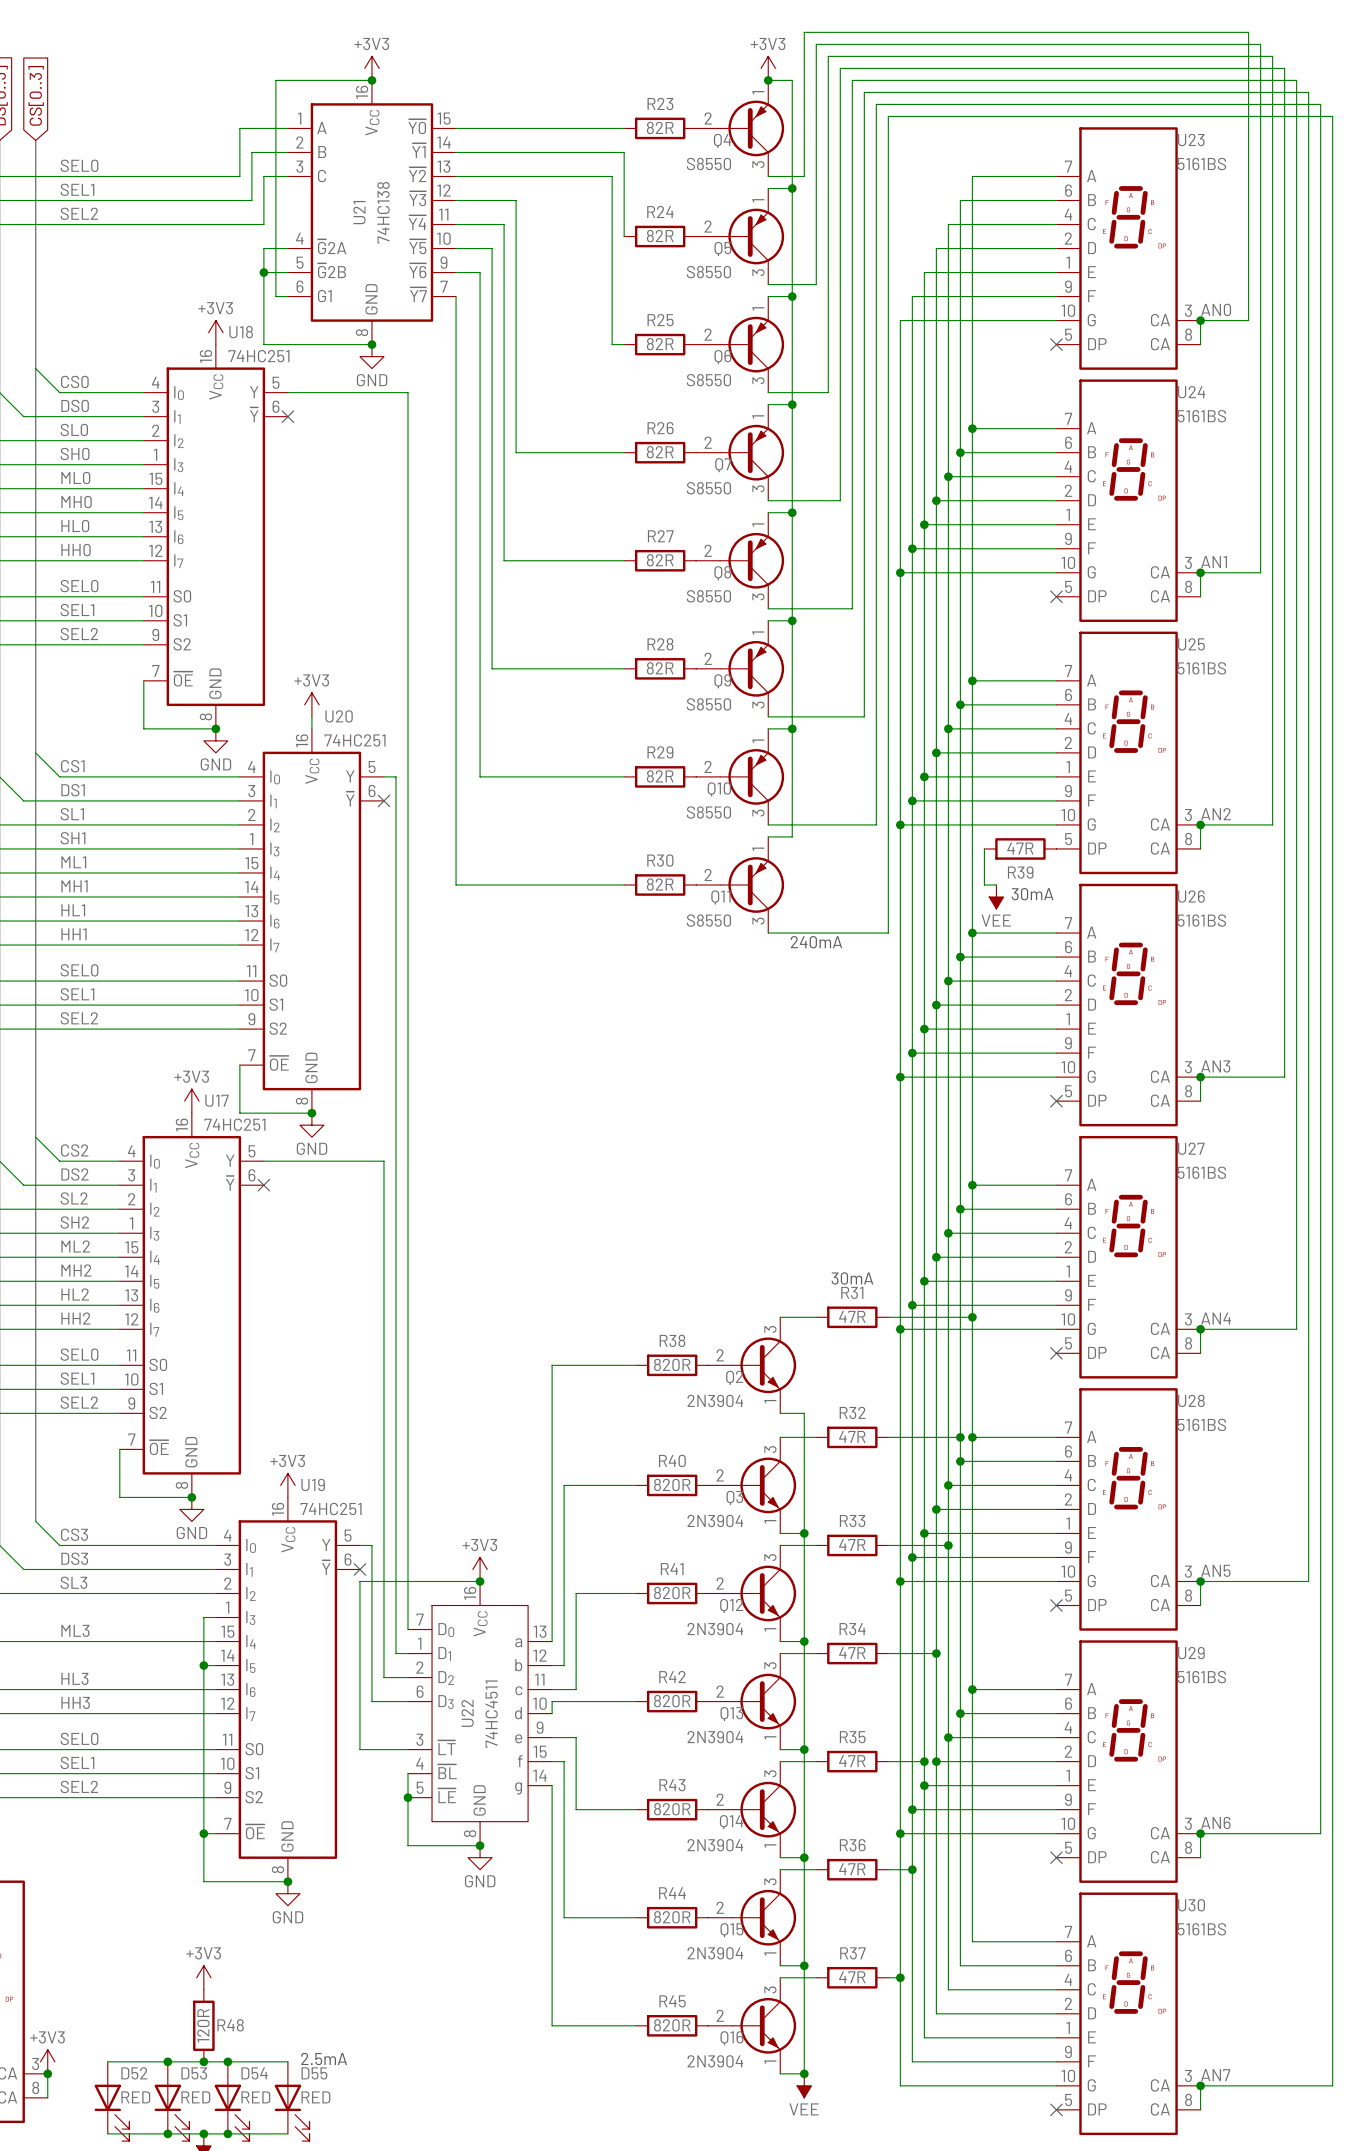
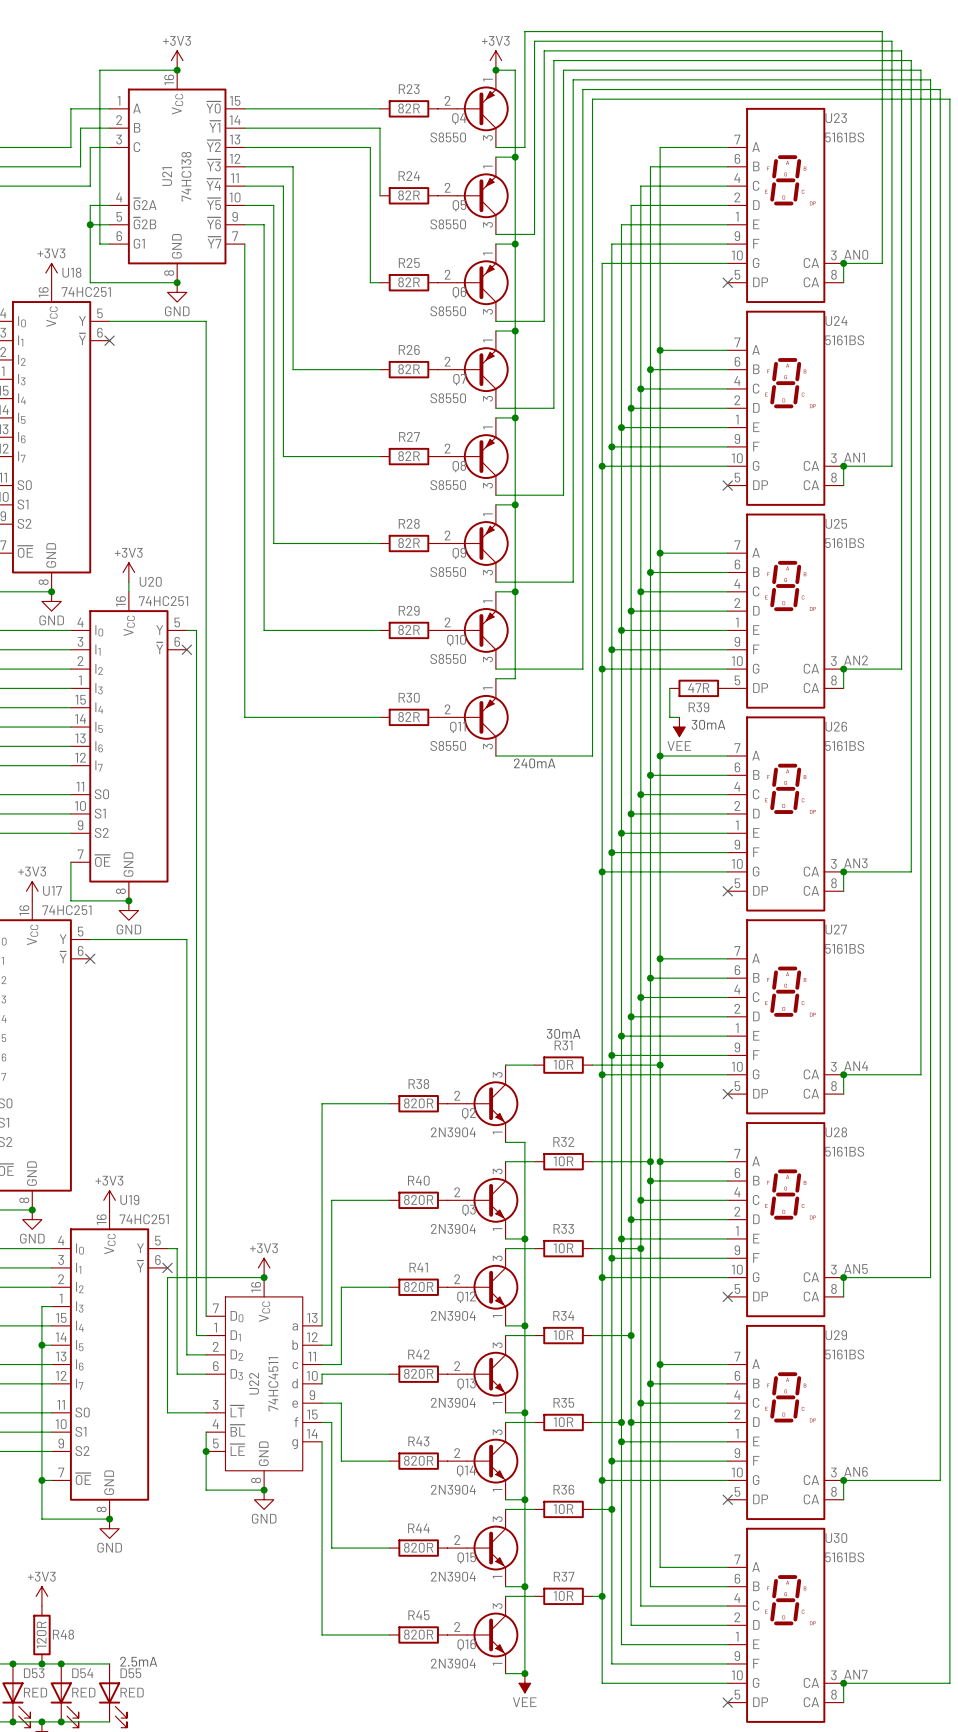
R31 value: 47R (852, 1316) -> 10R (563, 1064)
R32 value: 47R (852, 1436) -> 10R (563, 1161)
R33 value: 47R (852, 1545) -> 10R (563, 1248)
R34 value: 47R (852, 1653) -> 10R (563, 1335)
R35 value: 47R (852, 1761) -> 10R (563, 1422)
R36 value: 47R (852, 1869) -> 10R (563, 1509)
R37 value: 47R (852, 1977) -> 10R (563, 1595)

